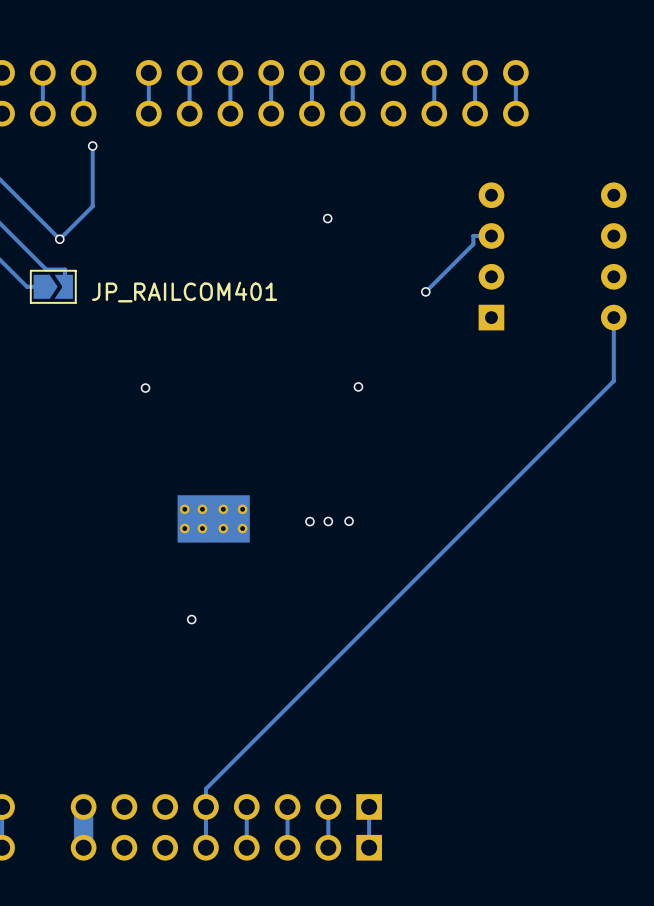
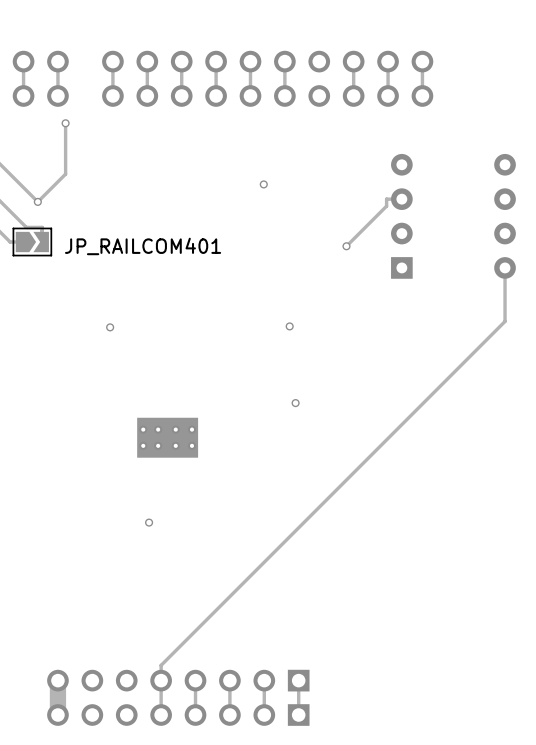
via: none -> (295, 403)
via: (309, 521) -> none
via: (328, 521) -> none
via: (349, 521) -> none

